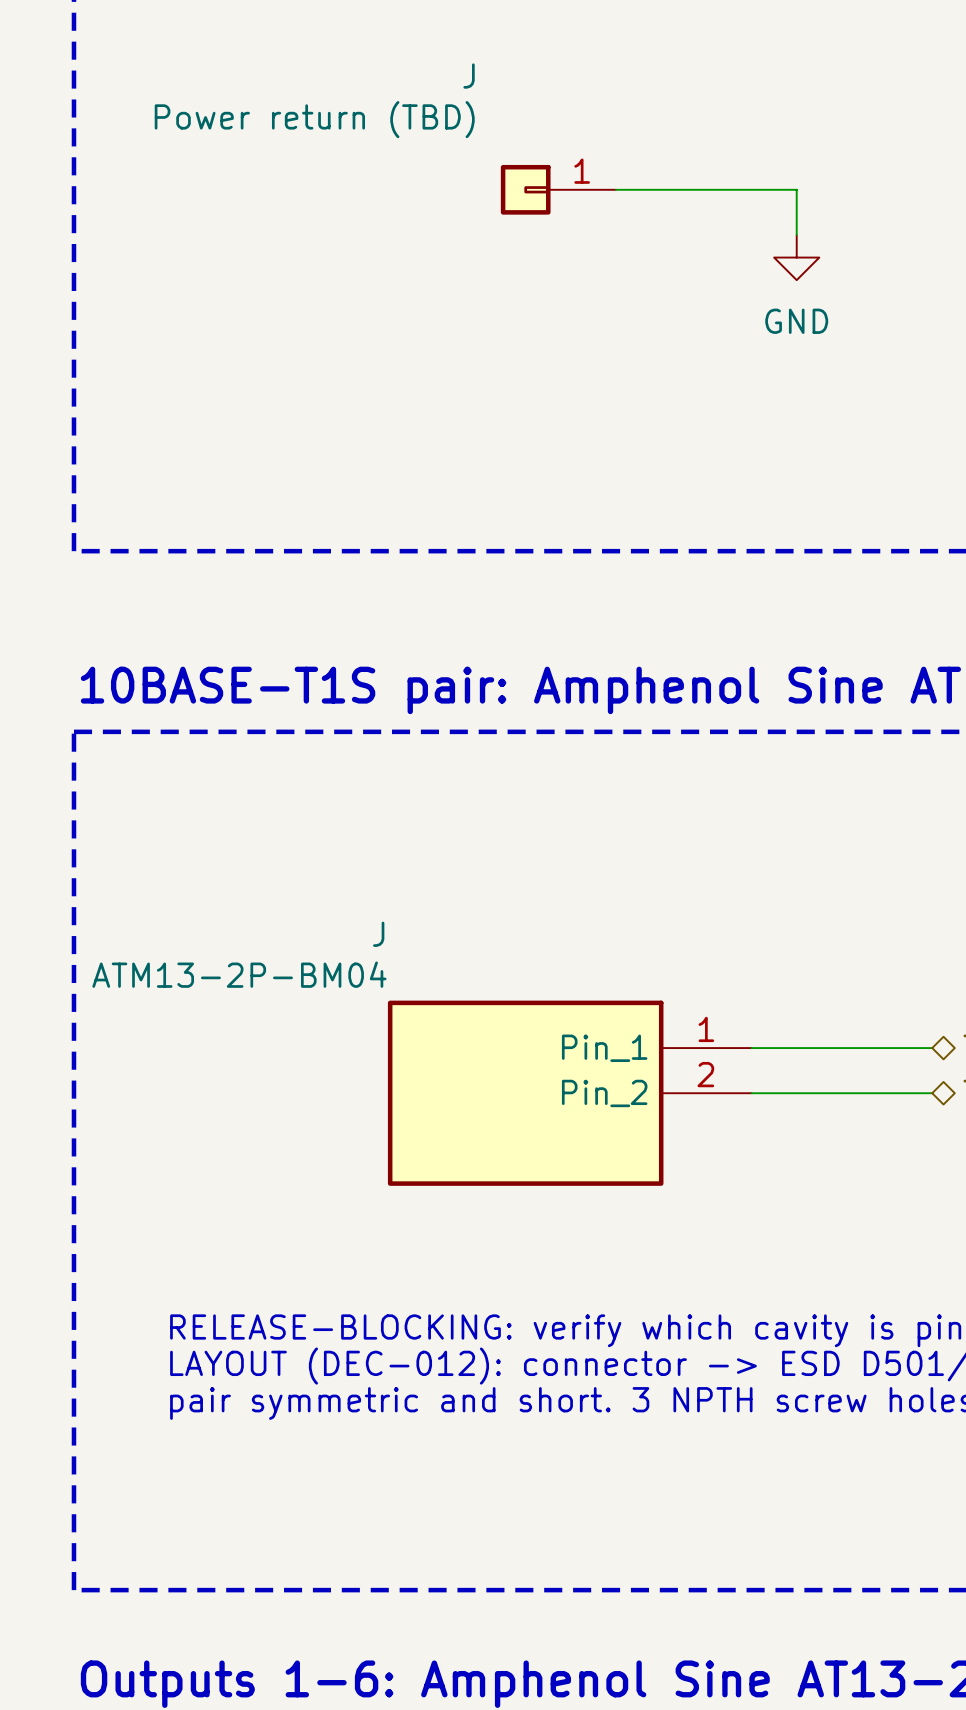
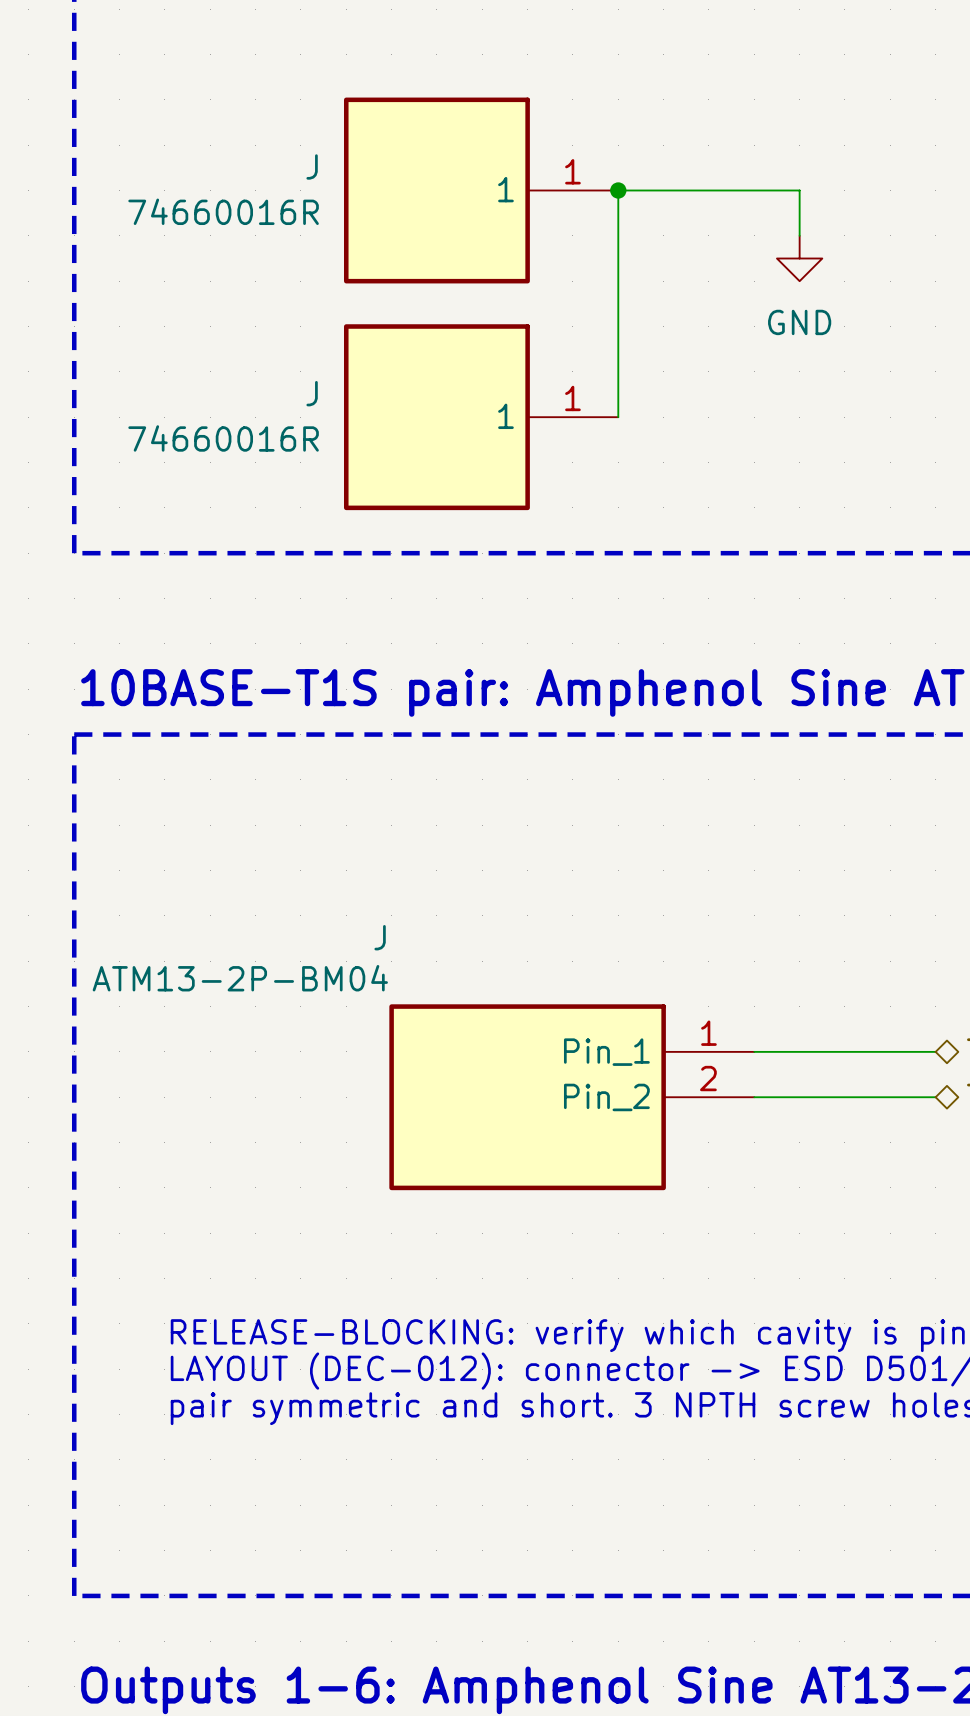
J: none -> 74660016R (481, 190)
J: Power return (TBD) (558, 189) -> none
wire: none -> (618, 190) (618, 417)
junction: none -> (618, 190)
J: none -> 74660016R (481, 417)

